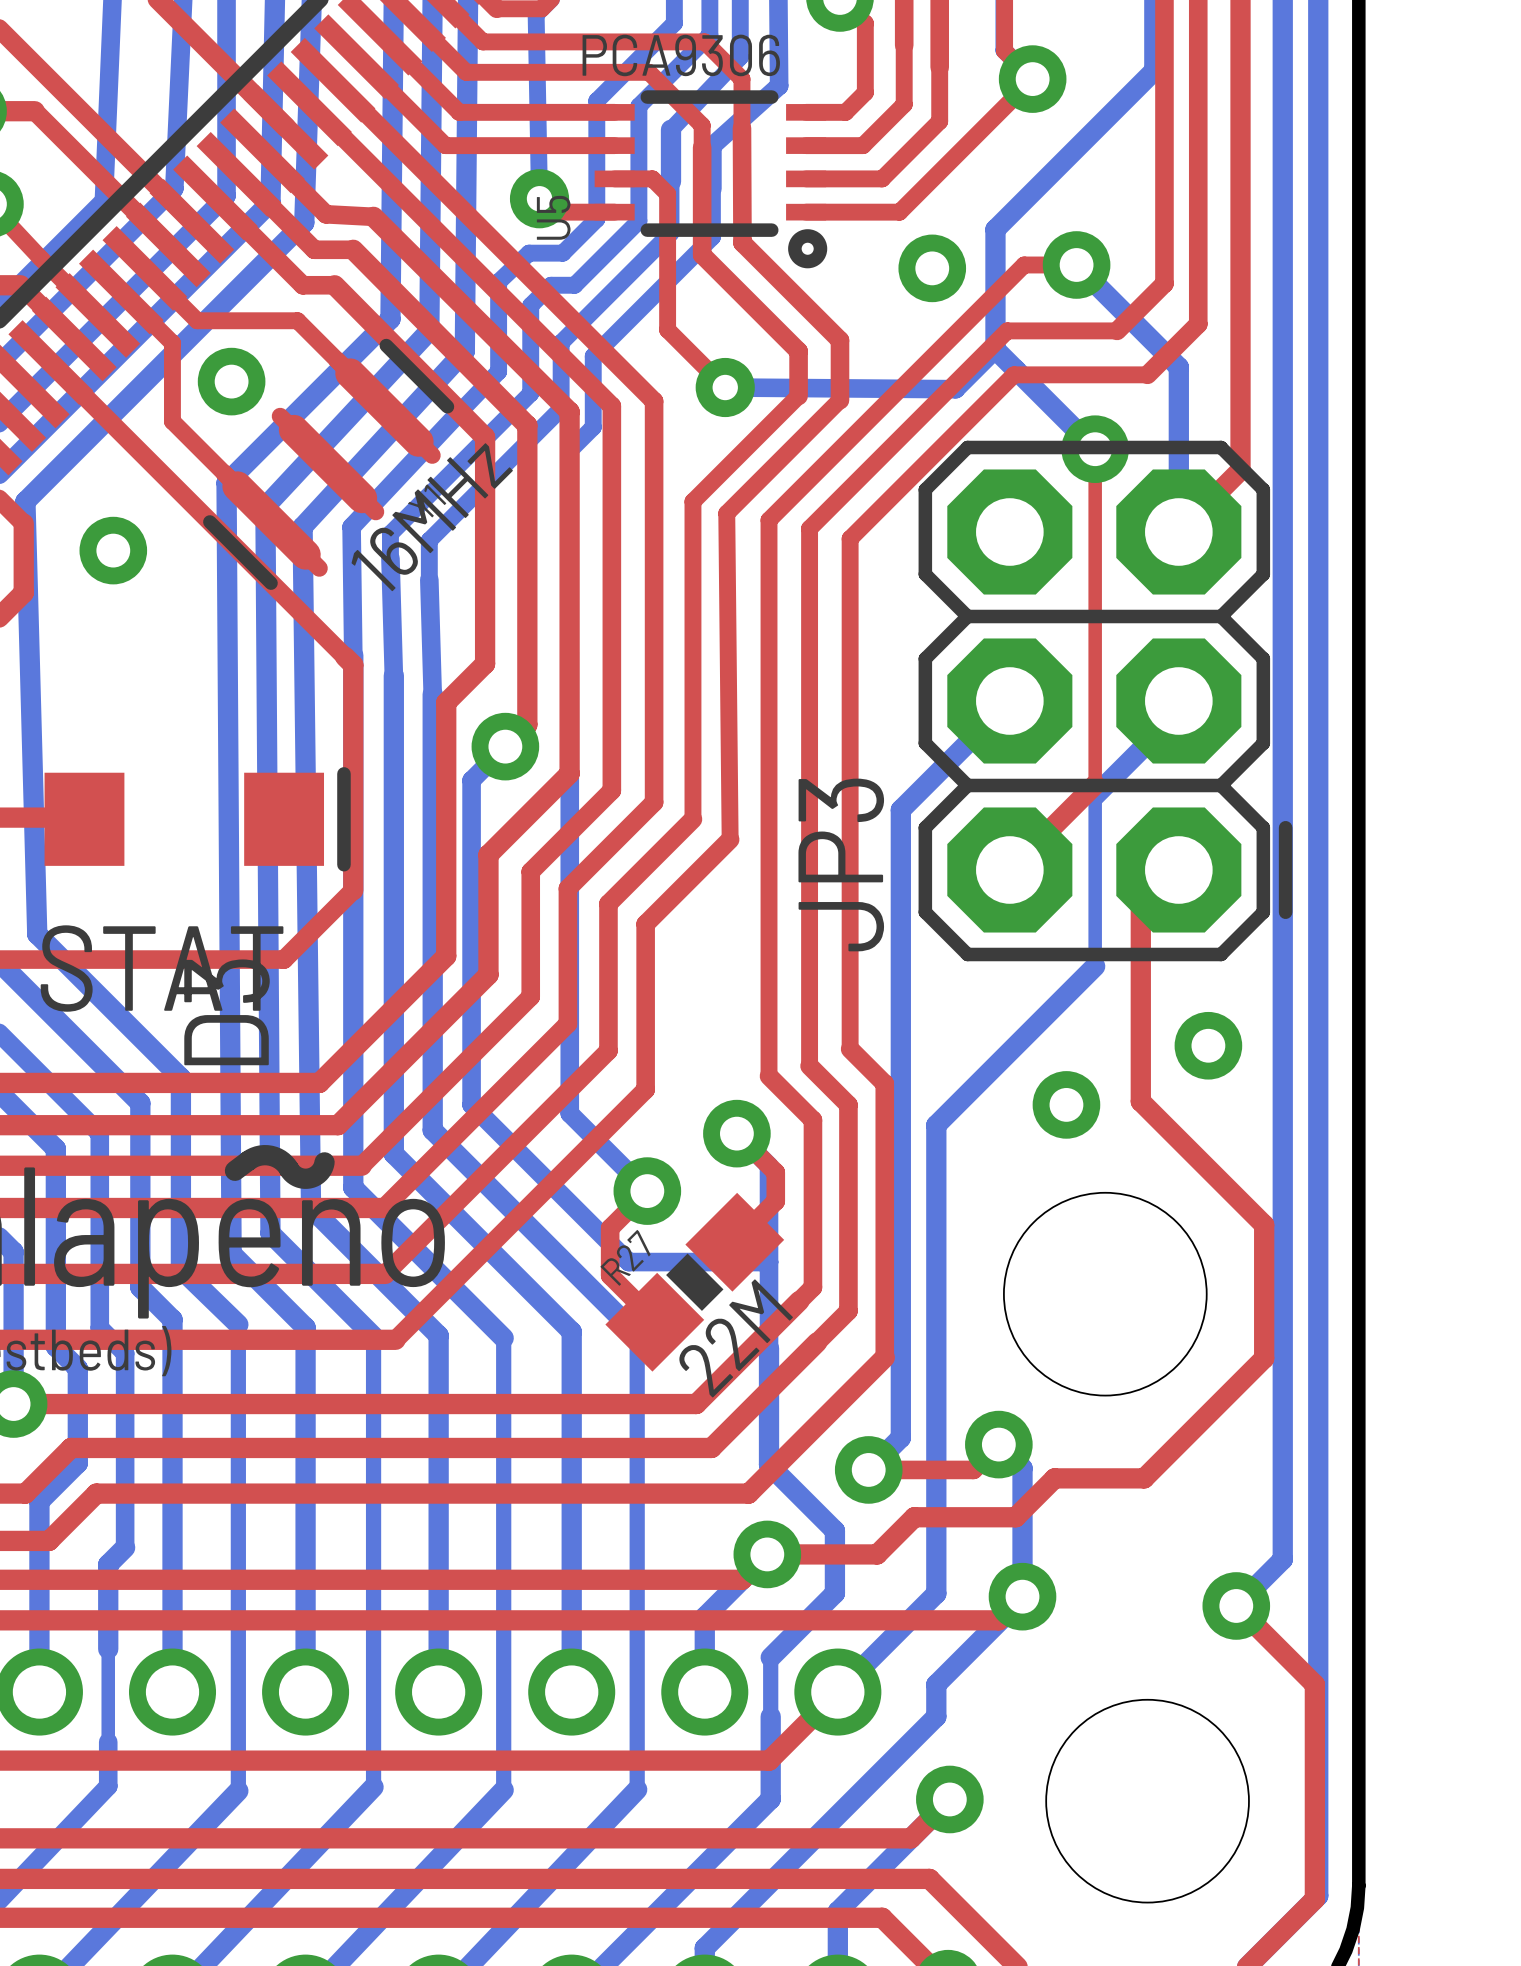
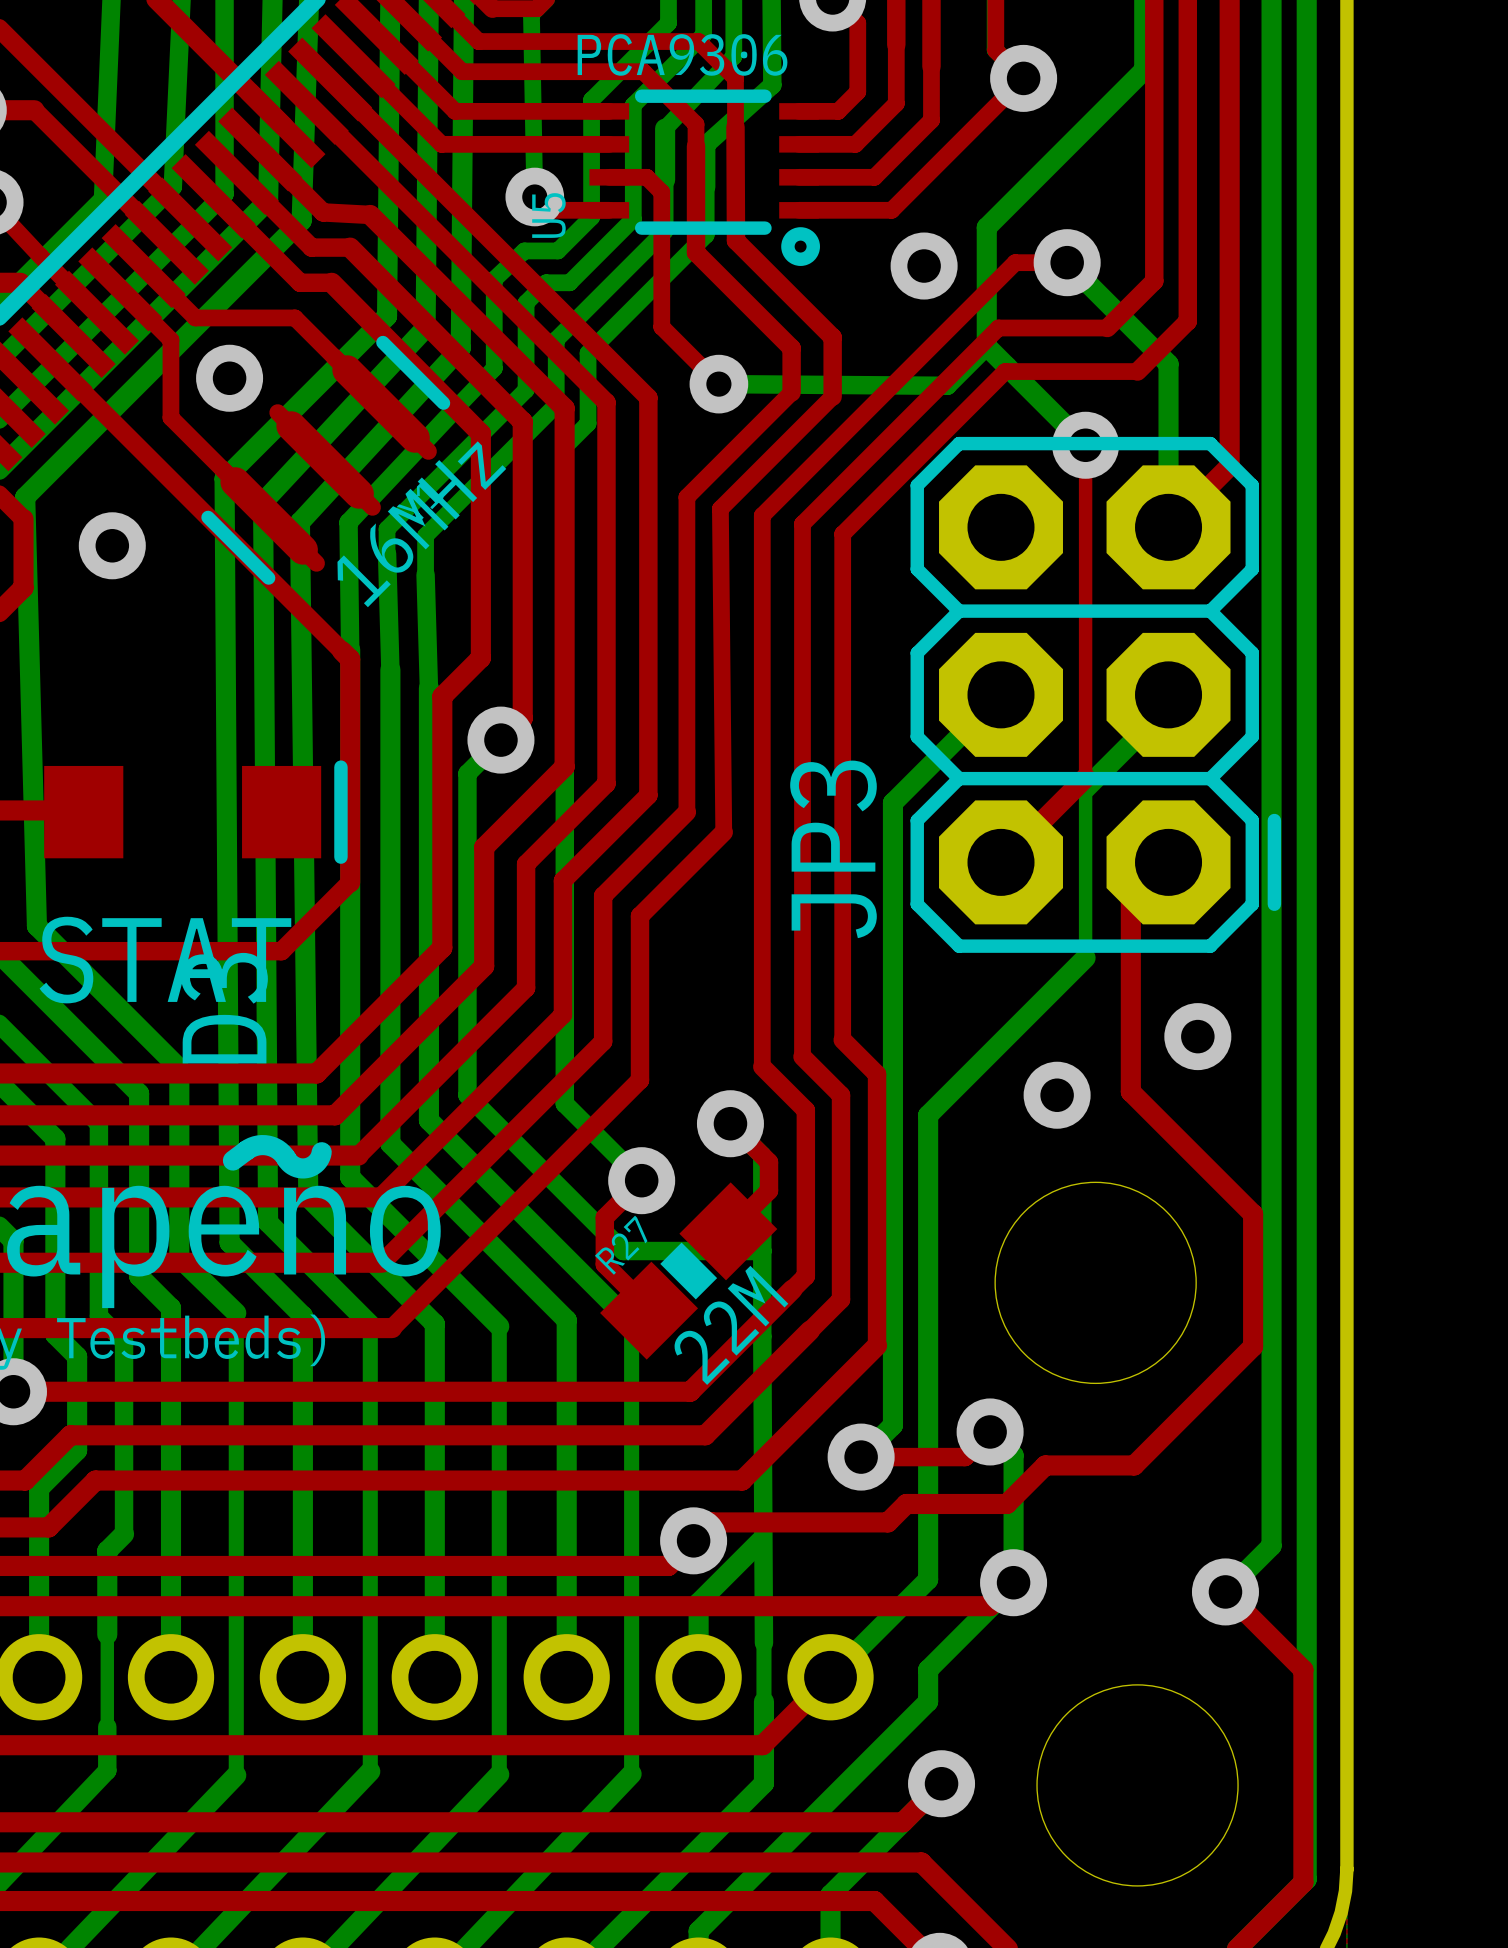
bottom track: (769, 1348) (769, 1464) (834, 1530) (834, 1593) (770, 1657) -> (762, 1336) (763, 1643)
top track: (895, 1535) (877, 1554) (767, 1554) (741, 1579) (674, 1579) -> (887, 1522) (712, 1522) (668, 1565)
via position: (767, 1554) -> (693, 1540)

